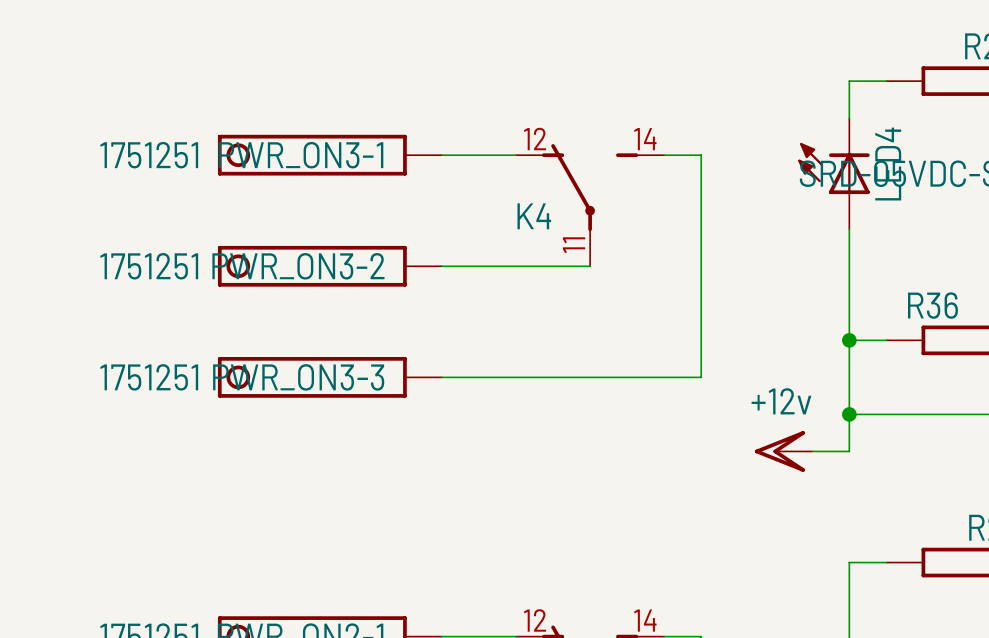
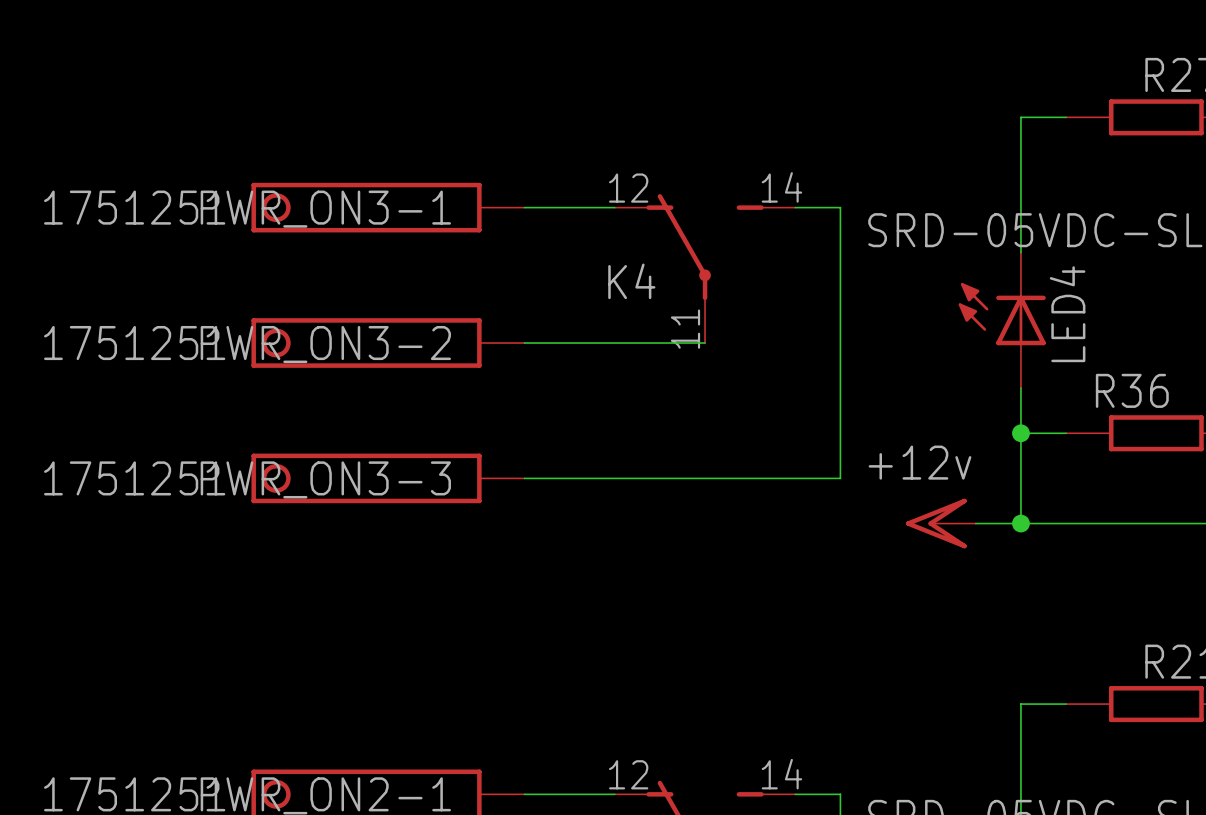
LED4 position: (833, 173) -> (1002, 320)
wire: (849, 414) (849, 451) (812, 451) -> (1020, 523) (975, 523)
power symbol position: +12v (783, 451) -> +12v (940, 523)

